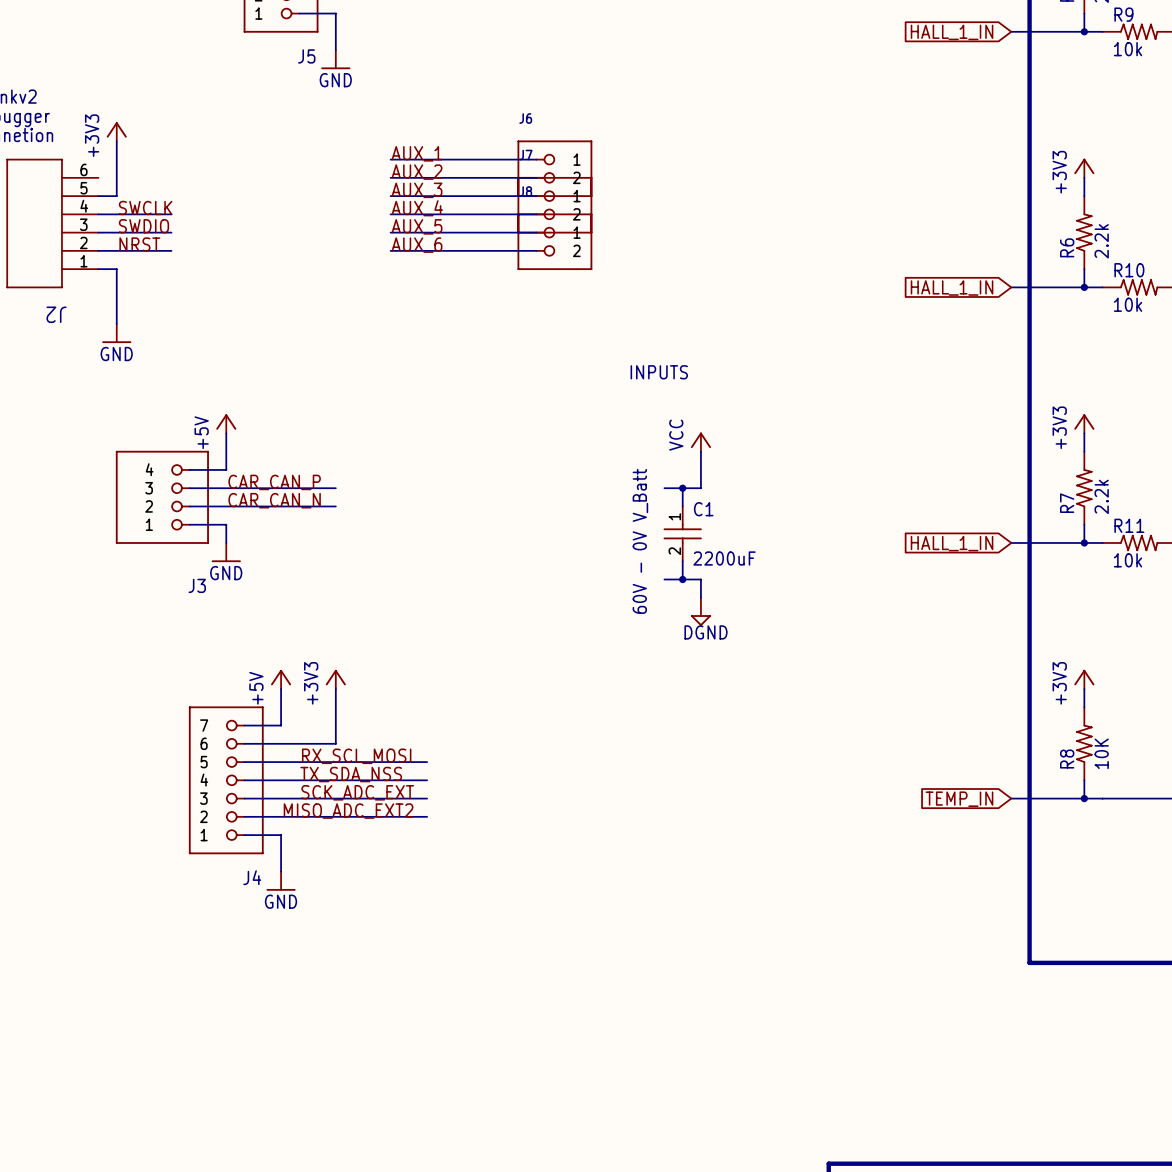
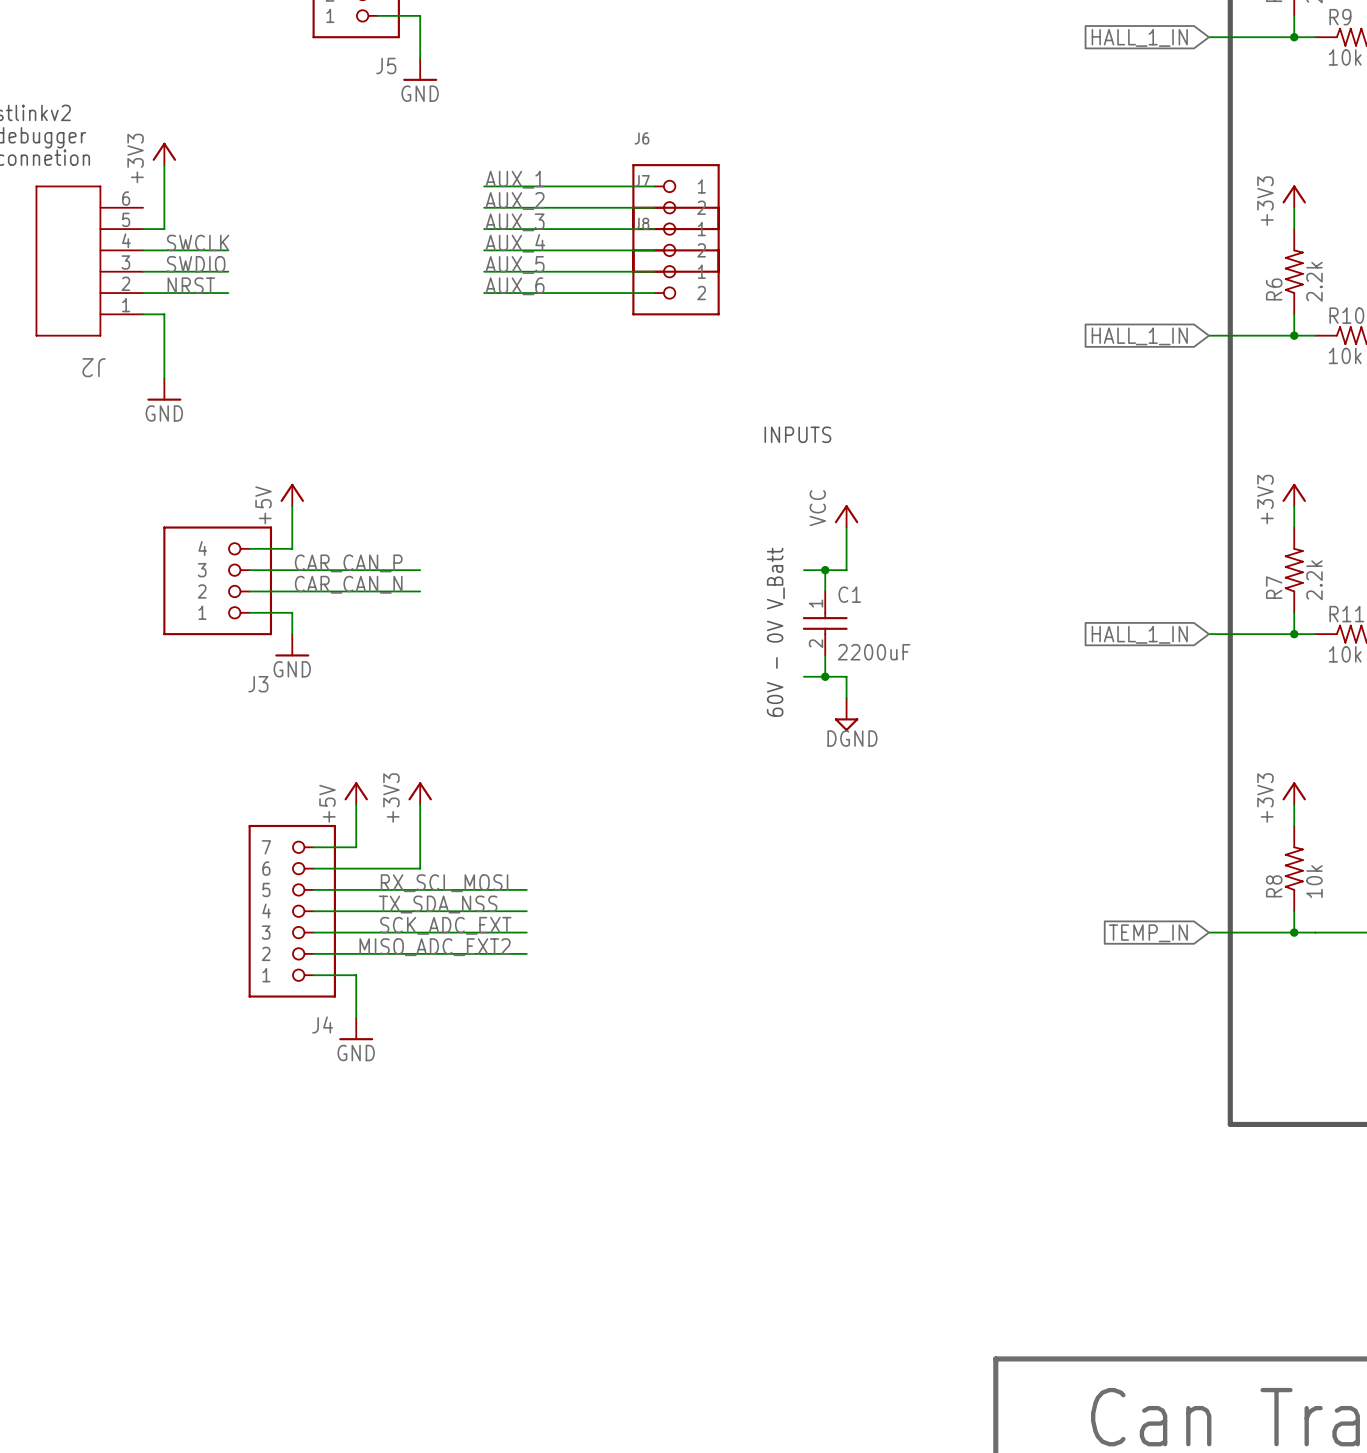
R8 value: 10K (1101, 753) -> 10k (1314, 881)

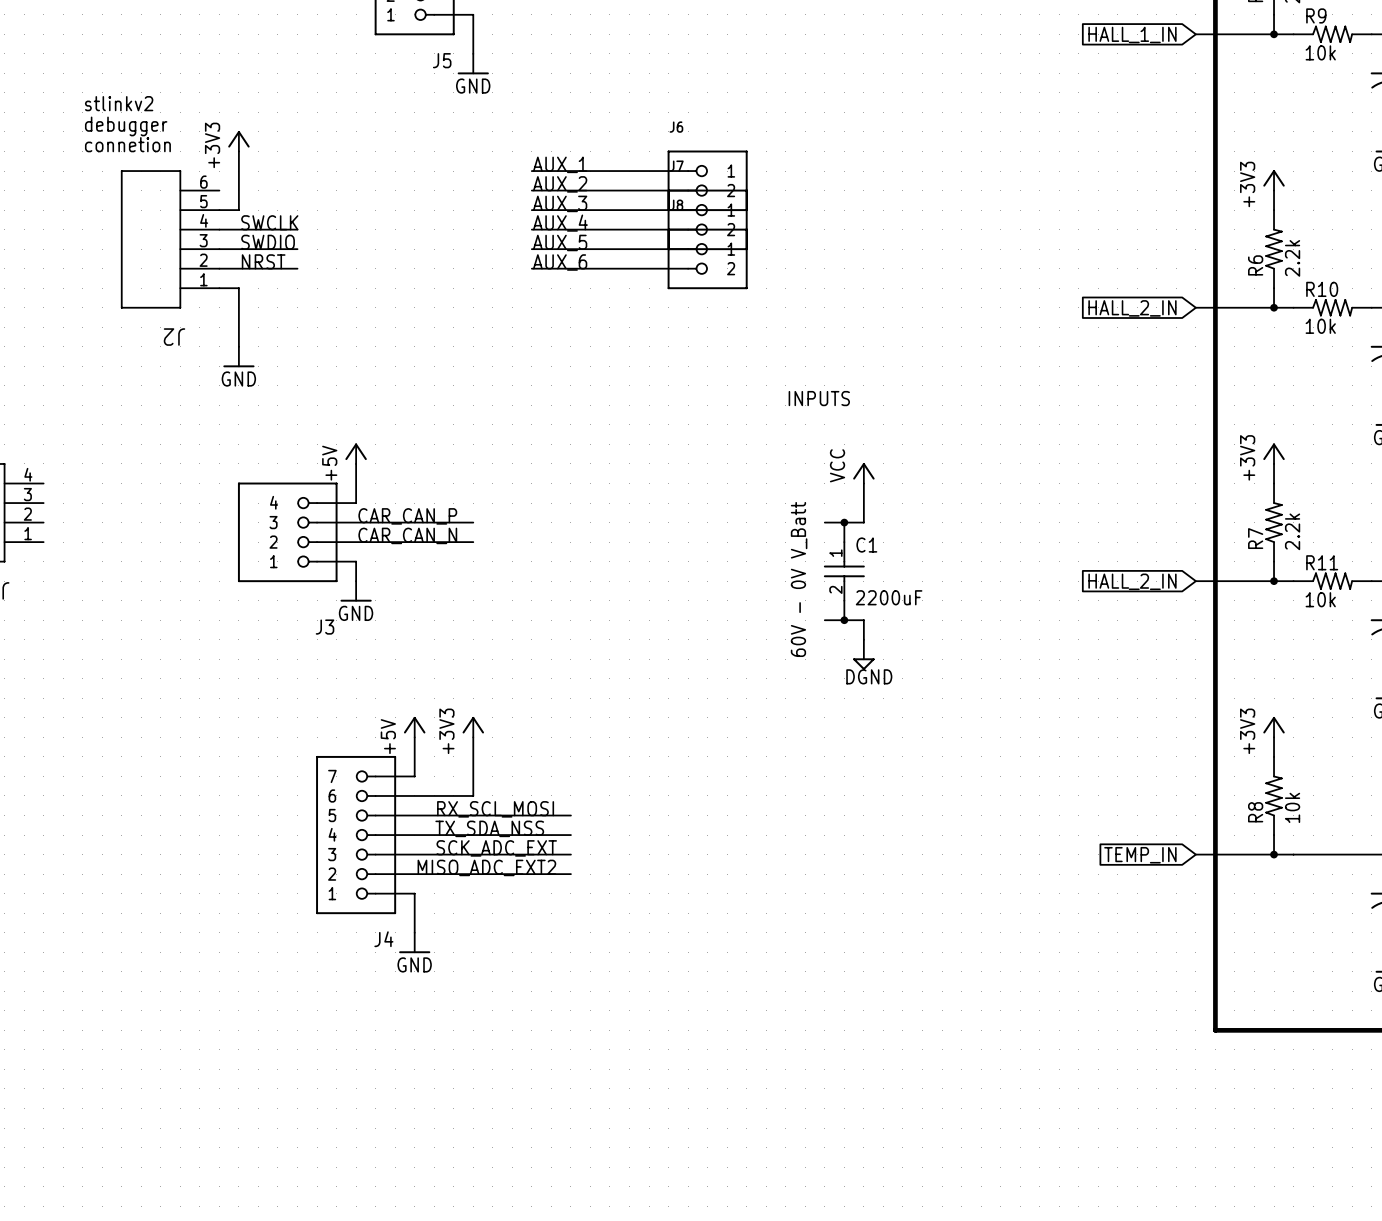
global label: HALL_1_IN (1139, 336) -> HALL_2_IN (1132, 308)
global label: HALL_1_IN (1139, 634) -> HALL_2_IN (1132, 581)

